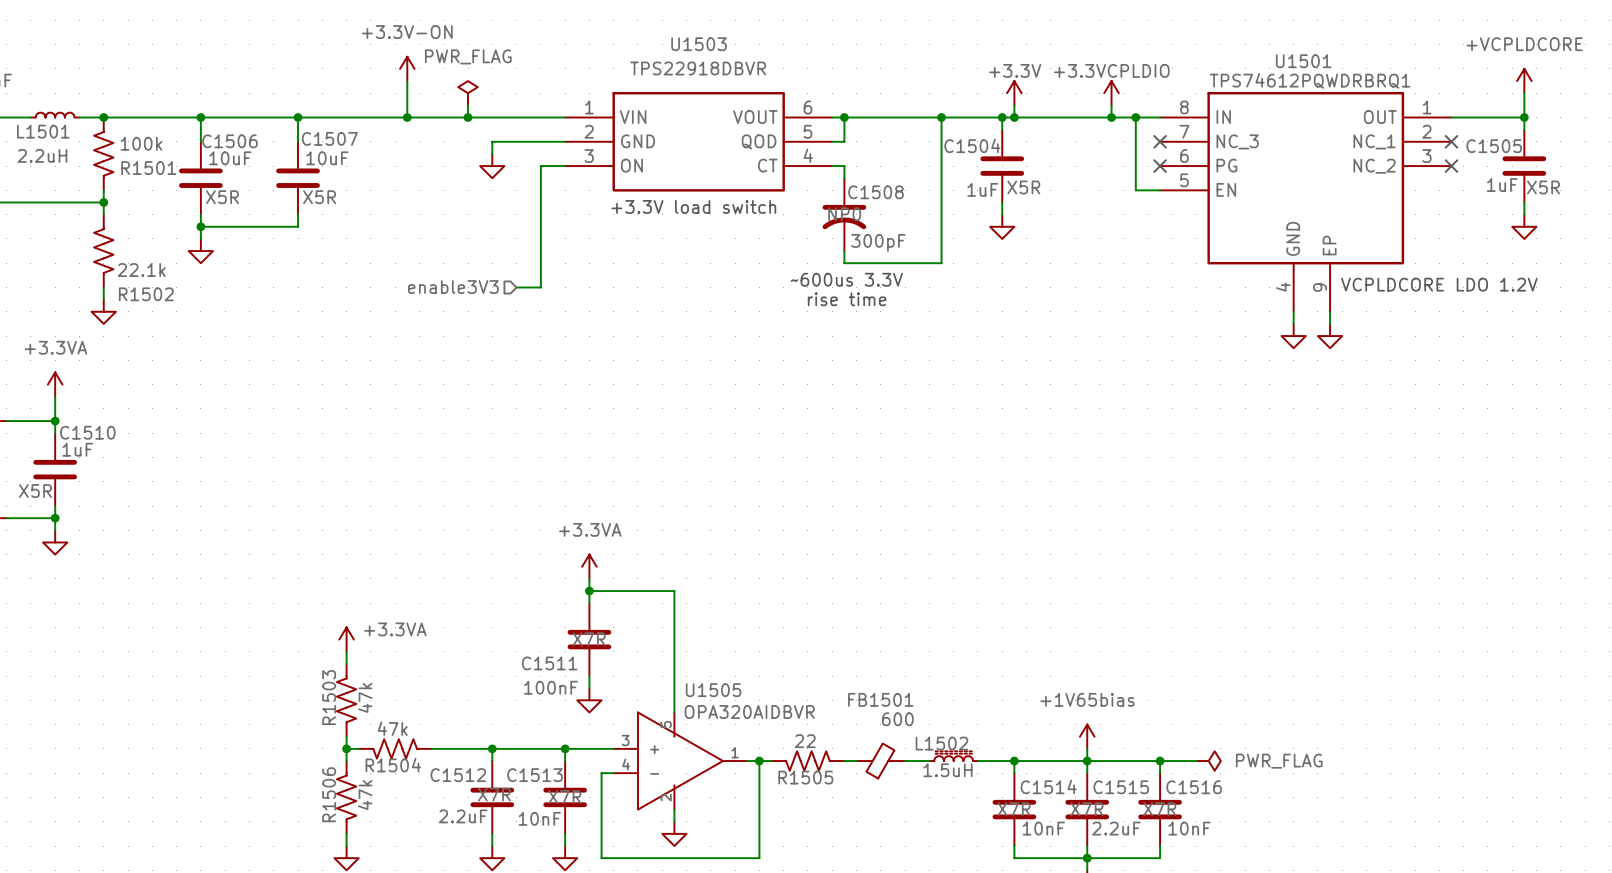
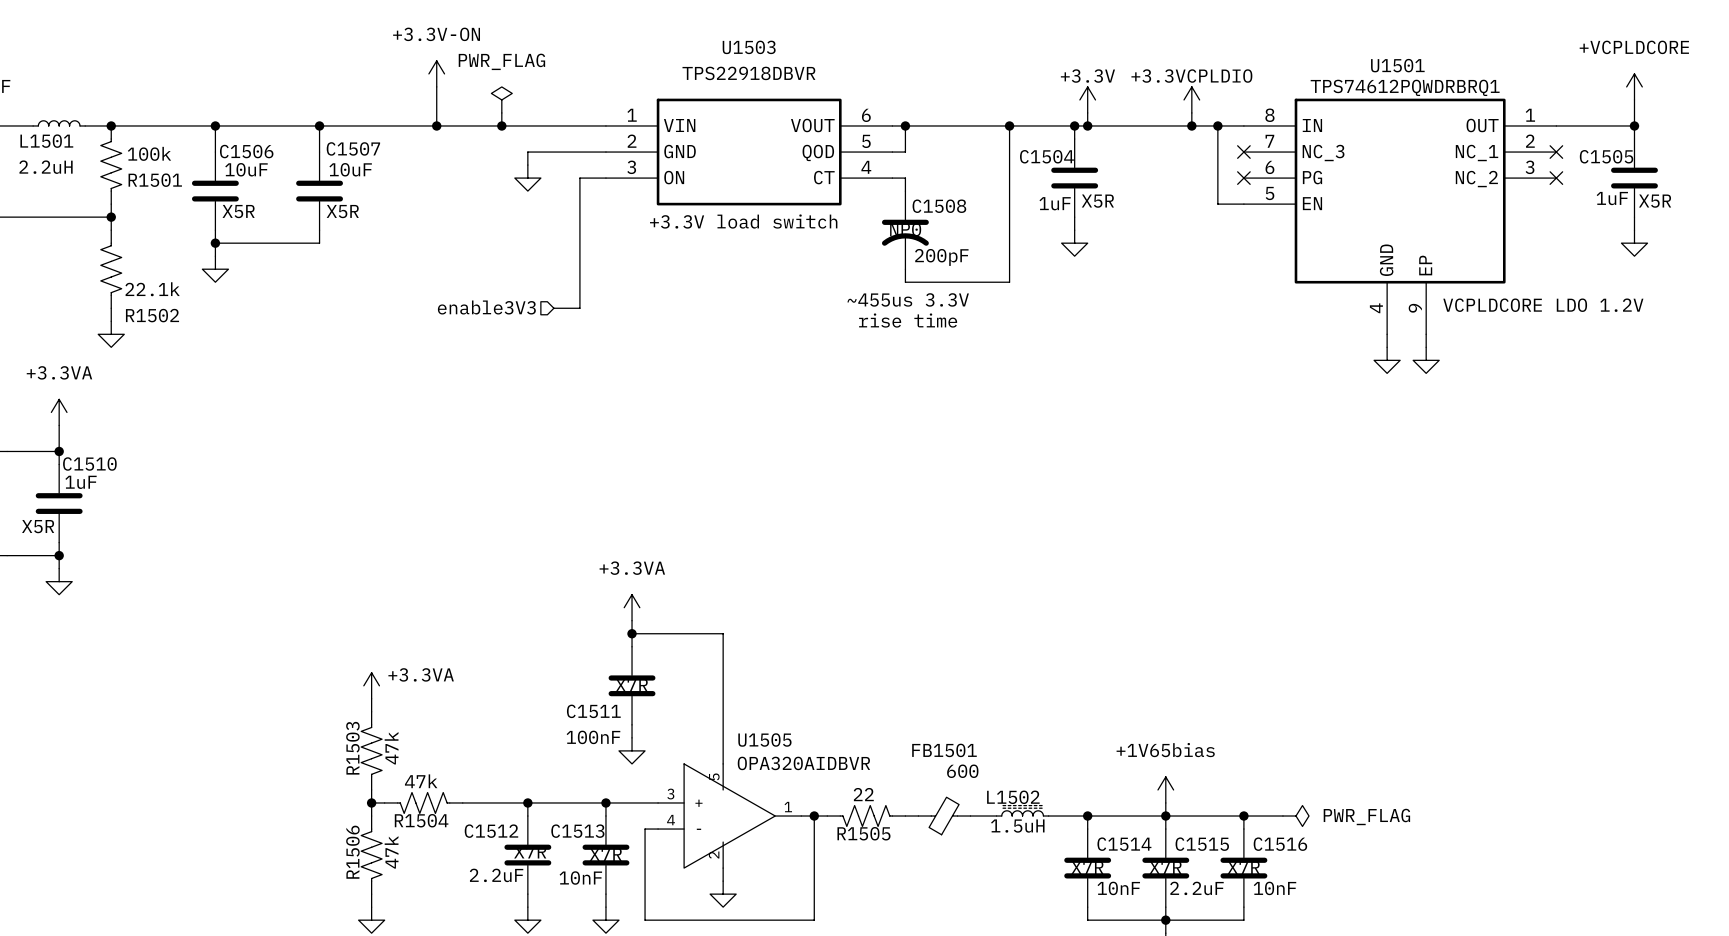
C1508 value: 300pF (878, 242) -> 200pF (941, 257)
text: ~600us 3.3V (846, 279) -> ~455us 3.3V (908, 299)

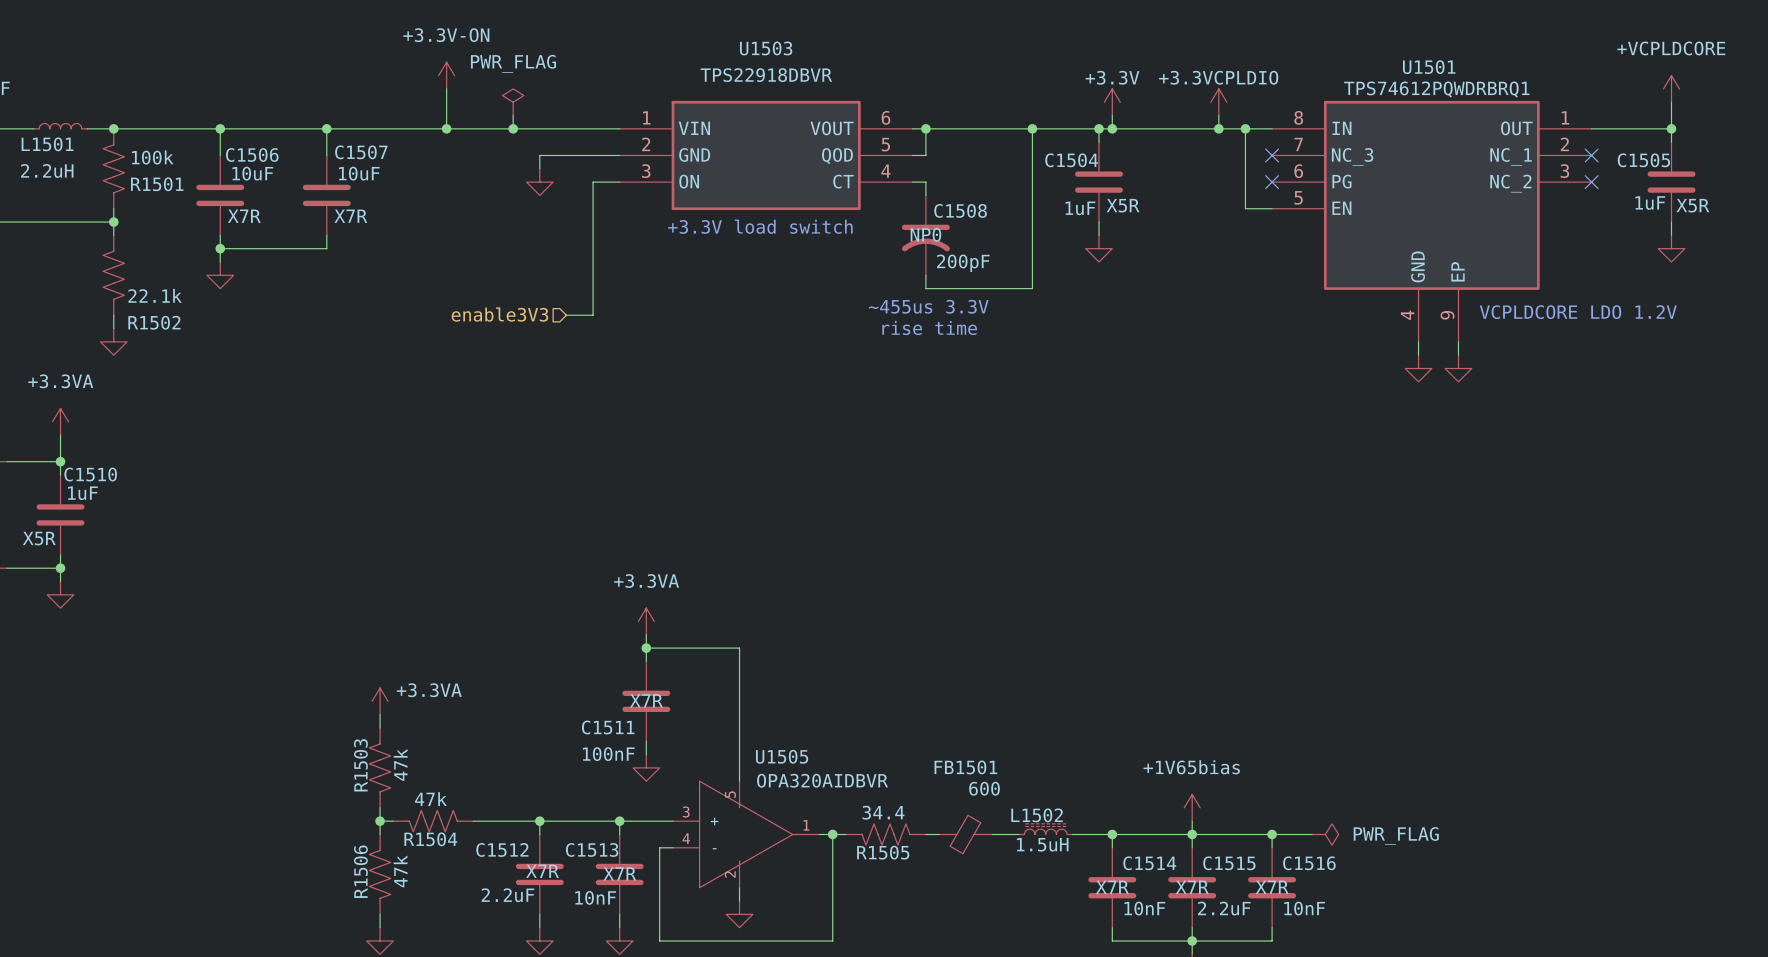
C1506 text: X5R (238, 211) -> X7R (244, 216)
C1507 text: X5R (342, 211) -> X7R (350, 216)
R1505 value: 22 (863, 794) -> 34.4 (883, 812)

